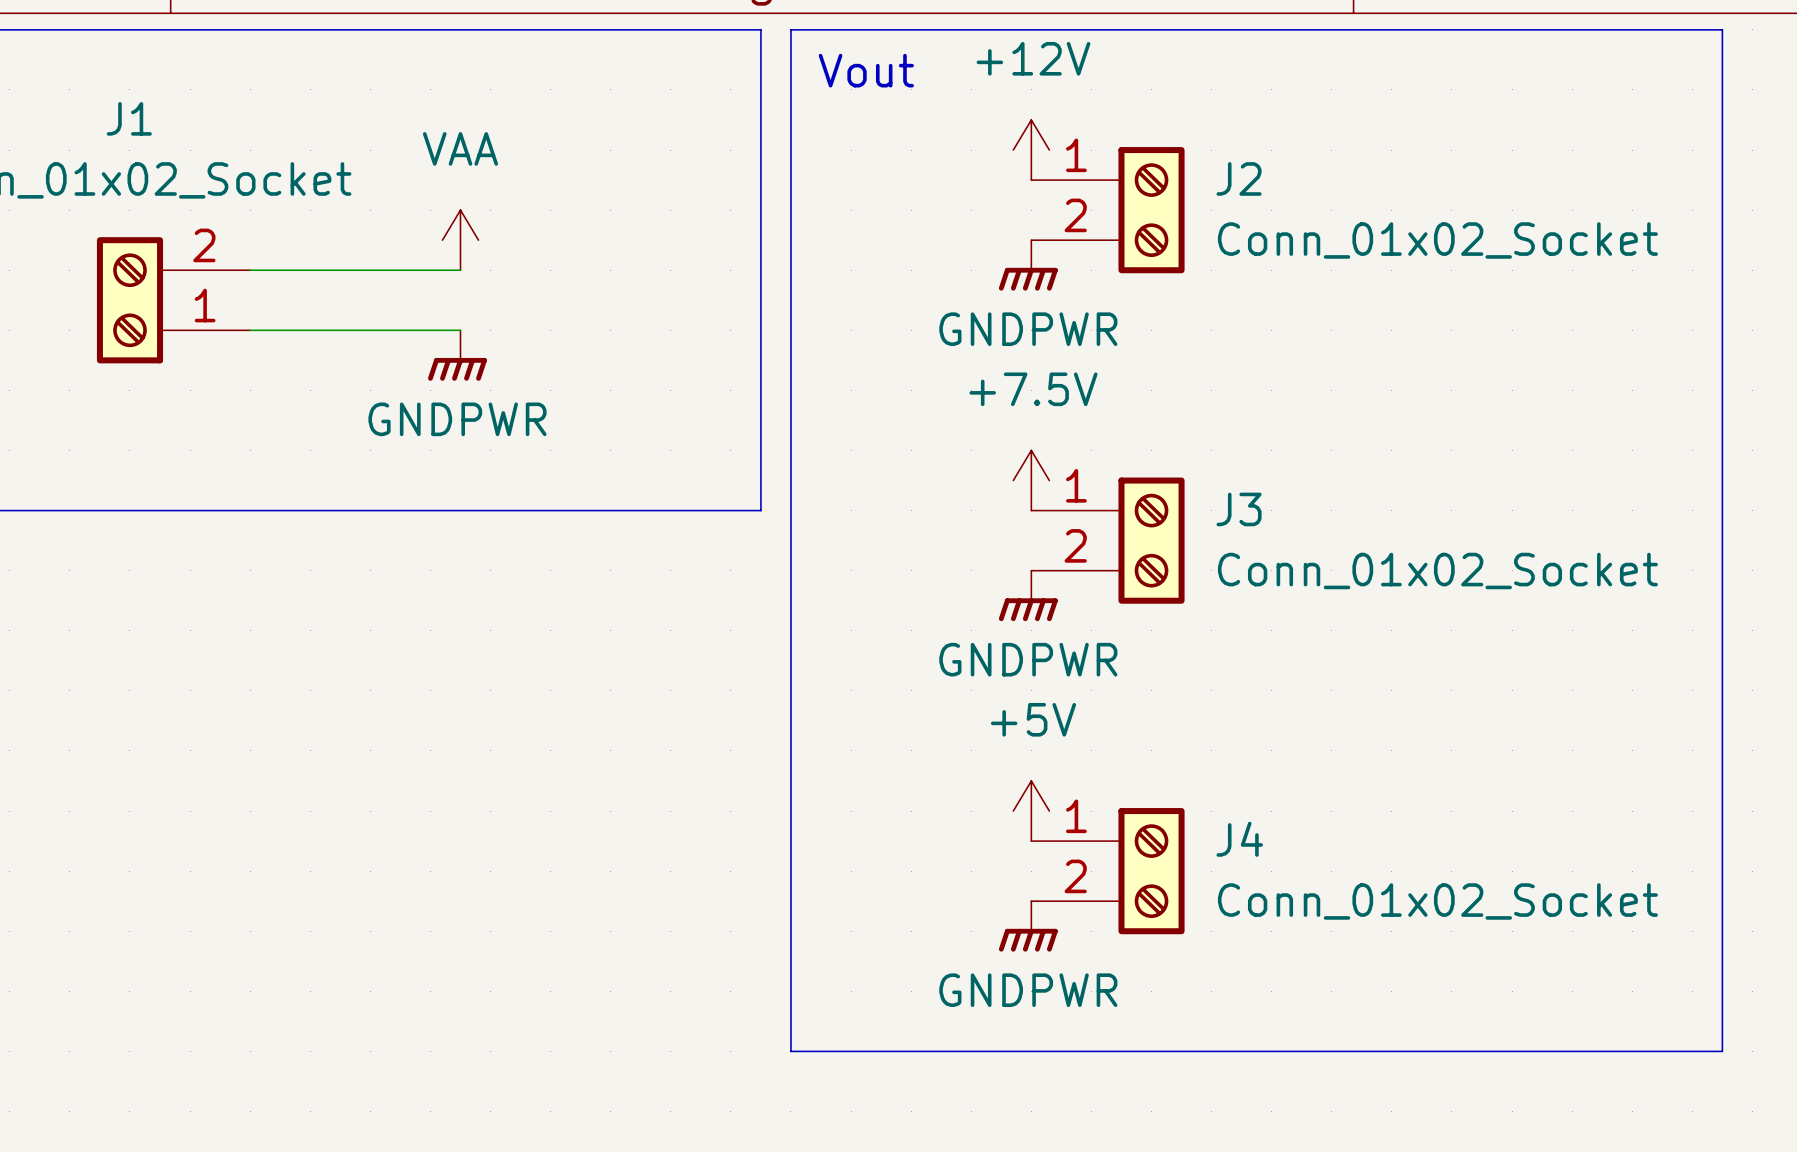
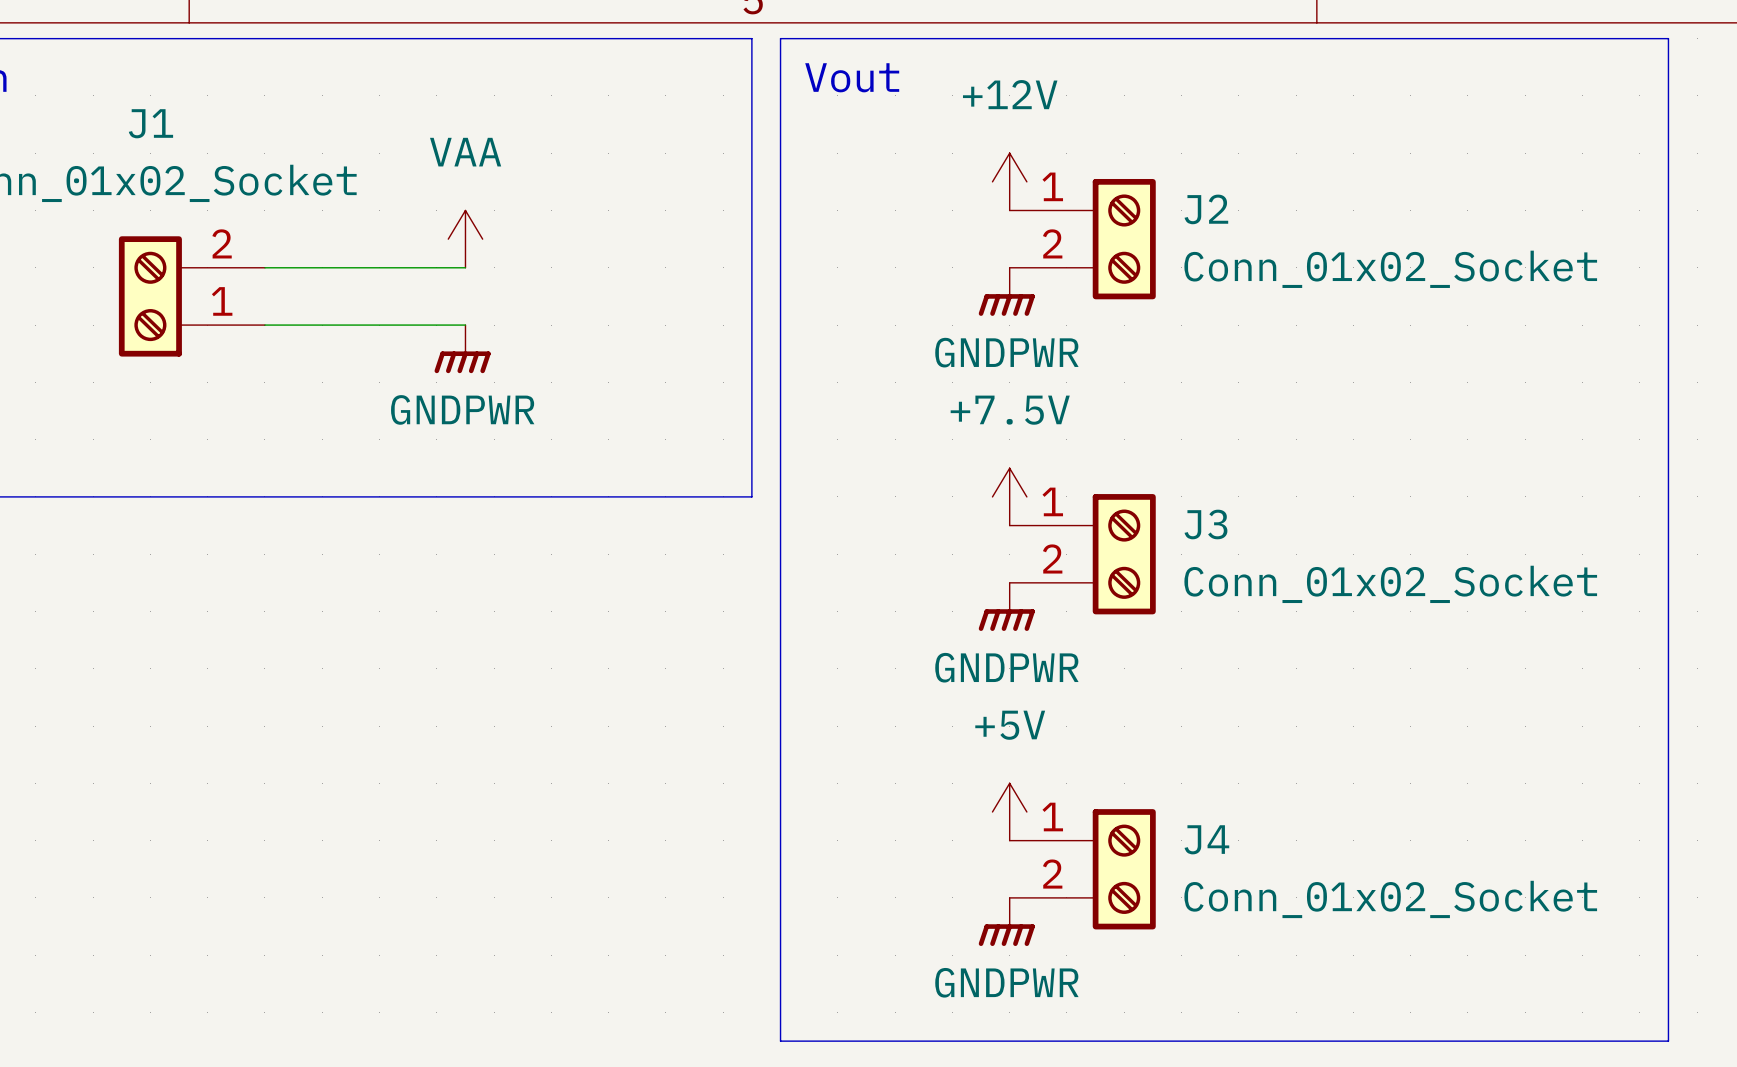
power symbol position: +12V (1031, 150) -> +12V (1009, 181)
J2 position: (1107, 210) -> (1082, 239)
power symbol position: GNDPWR (1028, 265) -> GNDPWR (1006, 291)
power symbol position: +7.5V (1031, 480) -> +7.5V (1009, 496)
J3 position: (1107, 540) -> (1082, 554)
power symbol position: GNDPWR (1028, 595) -> GNDPWR (1006, 606)
power symbol position: +5V (1031, 811) -> +5V (1009, 811)
J4 position: (1107, 871) -> (1082, 869)
power symbol position: GNDPWR (1028, 926) -> GNDPWR (1006, 921)
line: (790, 1051) (1722, 1051) -> (780, 1012) (780, 1041) (1668, 1041) (1668, 1012)

